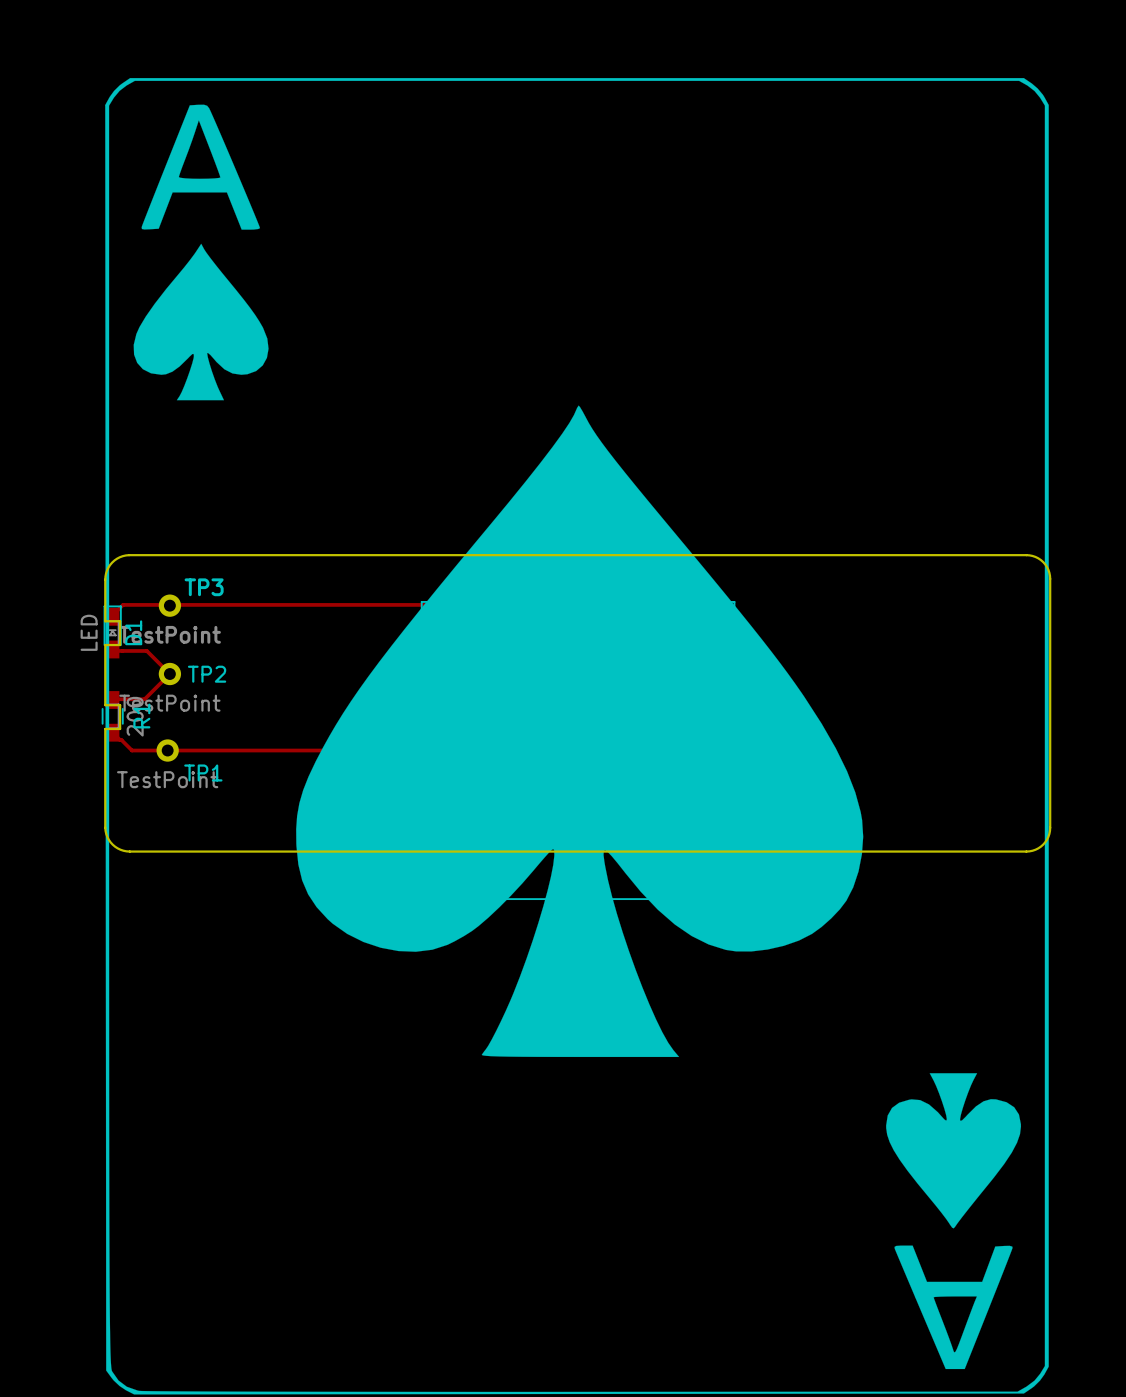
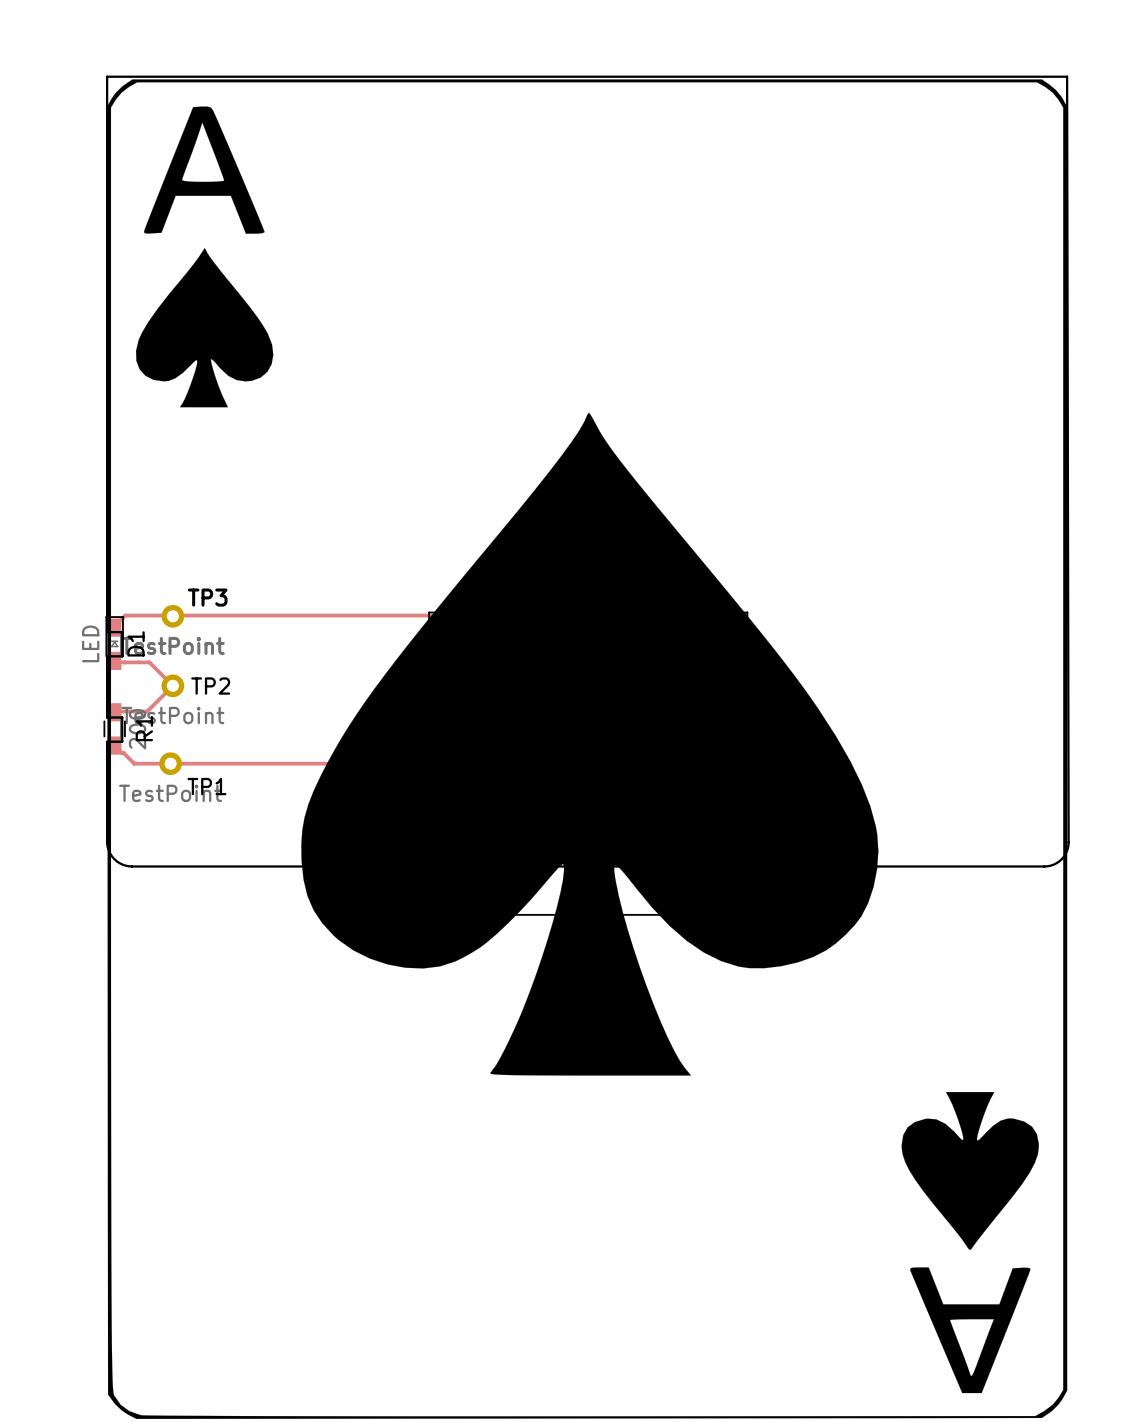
board edge: (105, 579) (107, 570) (112, 562) (119, 557) (129, 555) (1032, 555) (1045, 564) (1050, 578) (1050, 827) -> (107, 589) (107, 76) (1067, 76) (1068, 842)

